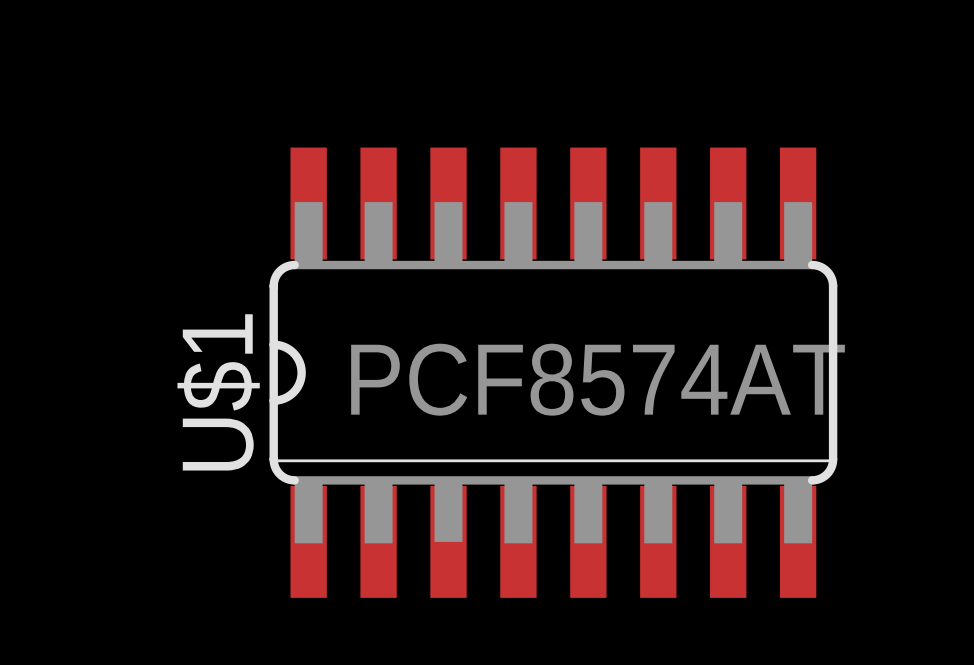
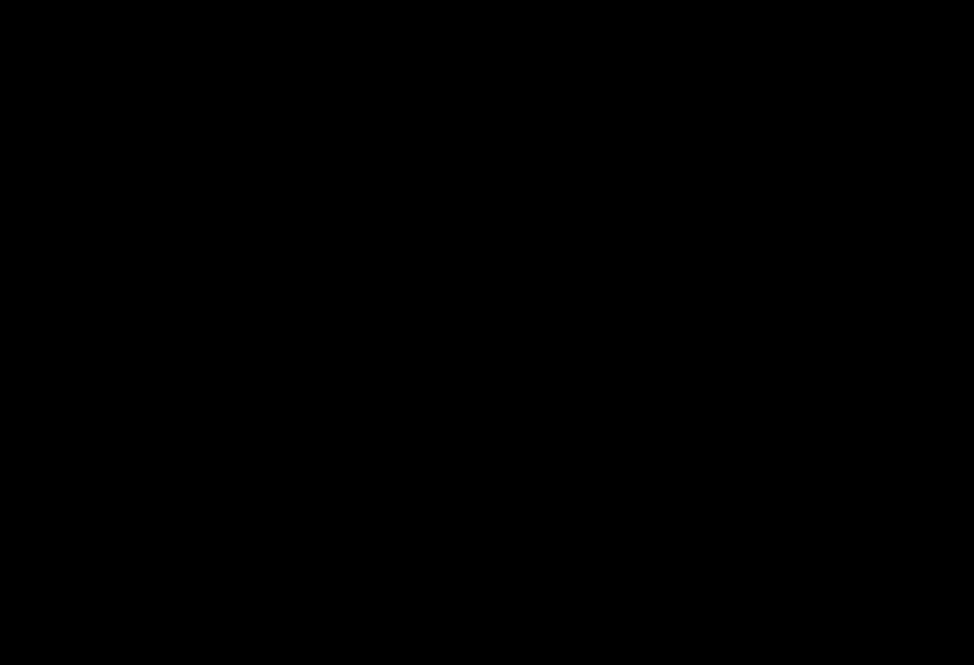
U$1: PCF8574AT (553, 372) -> none

